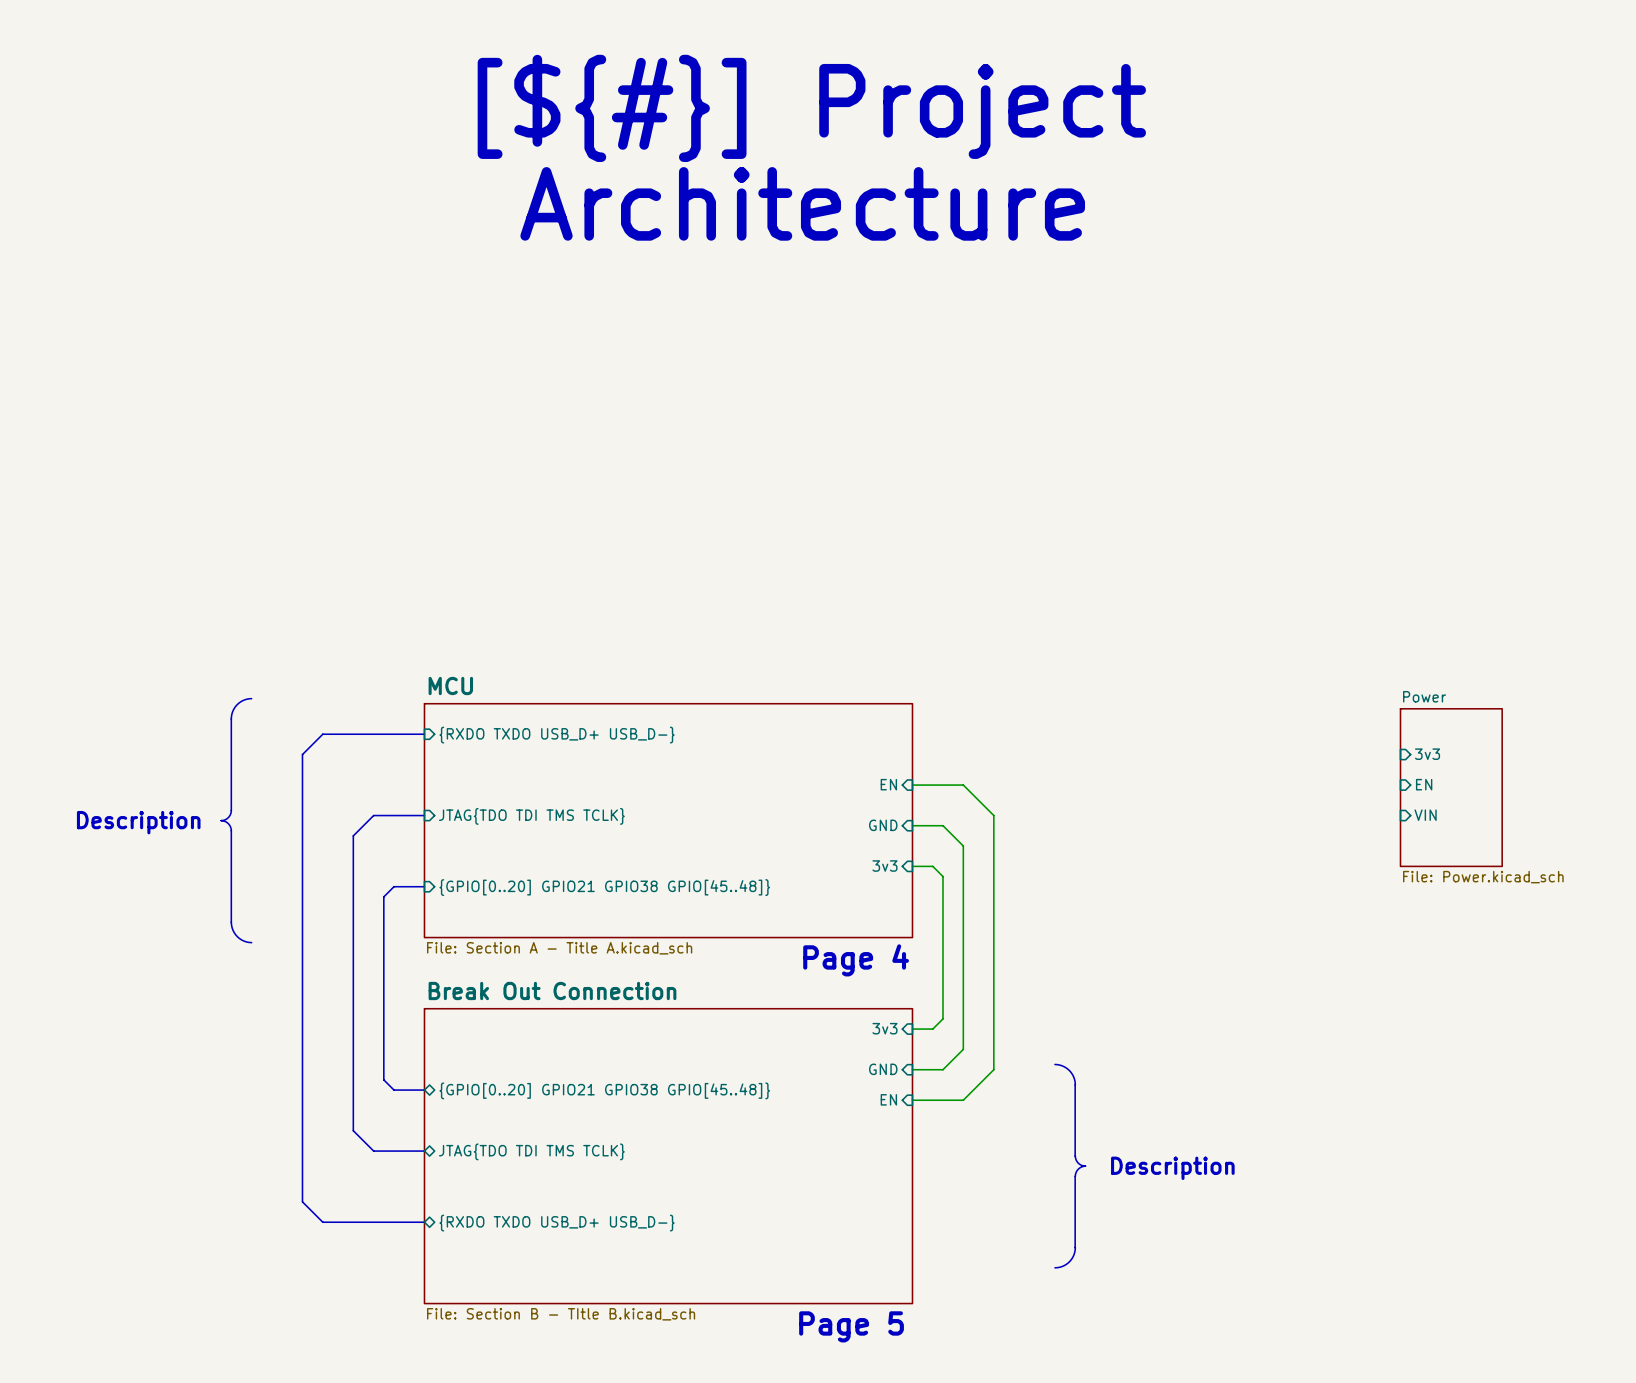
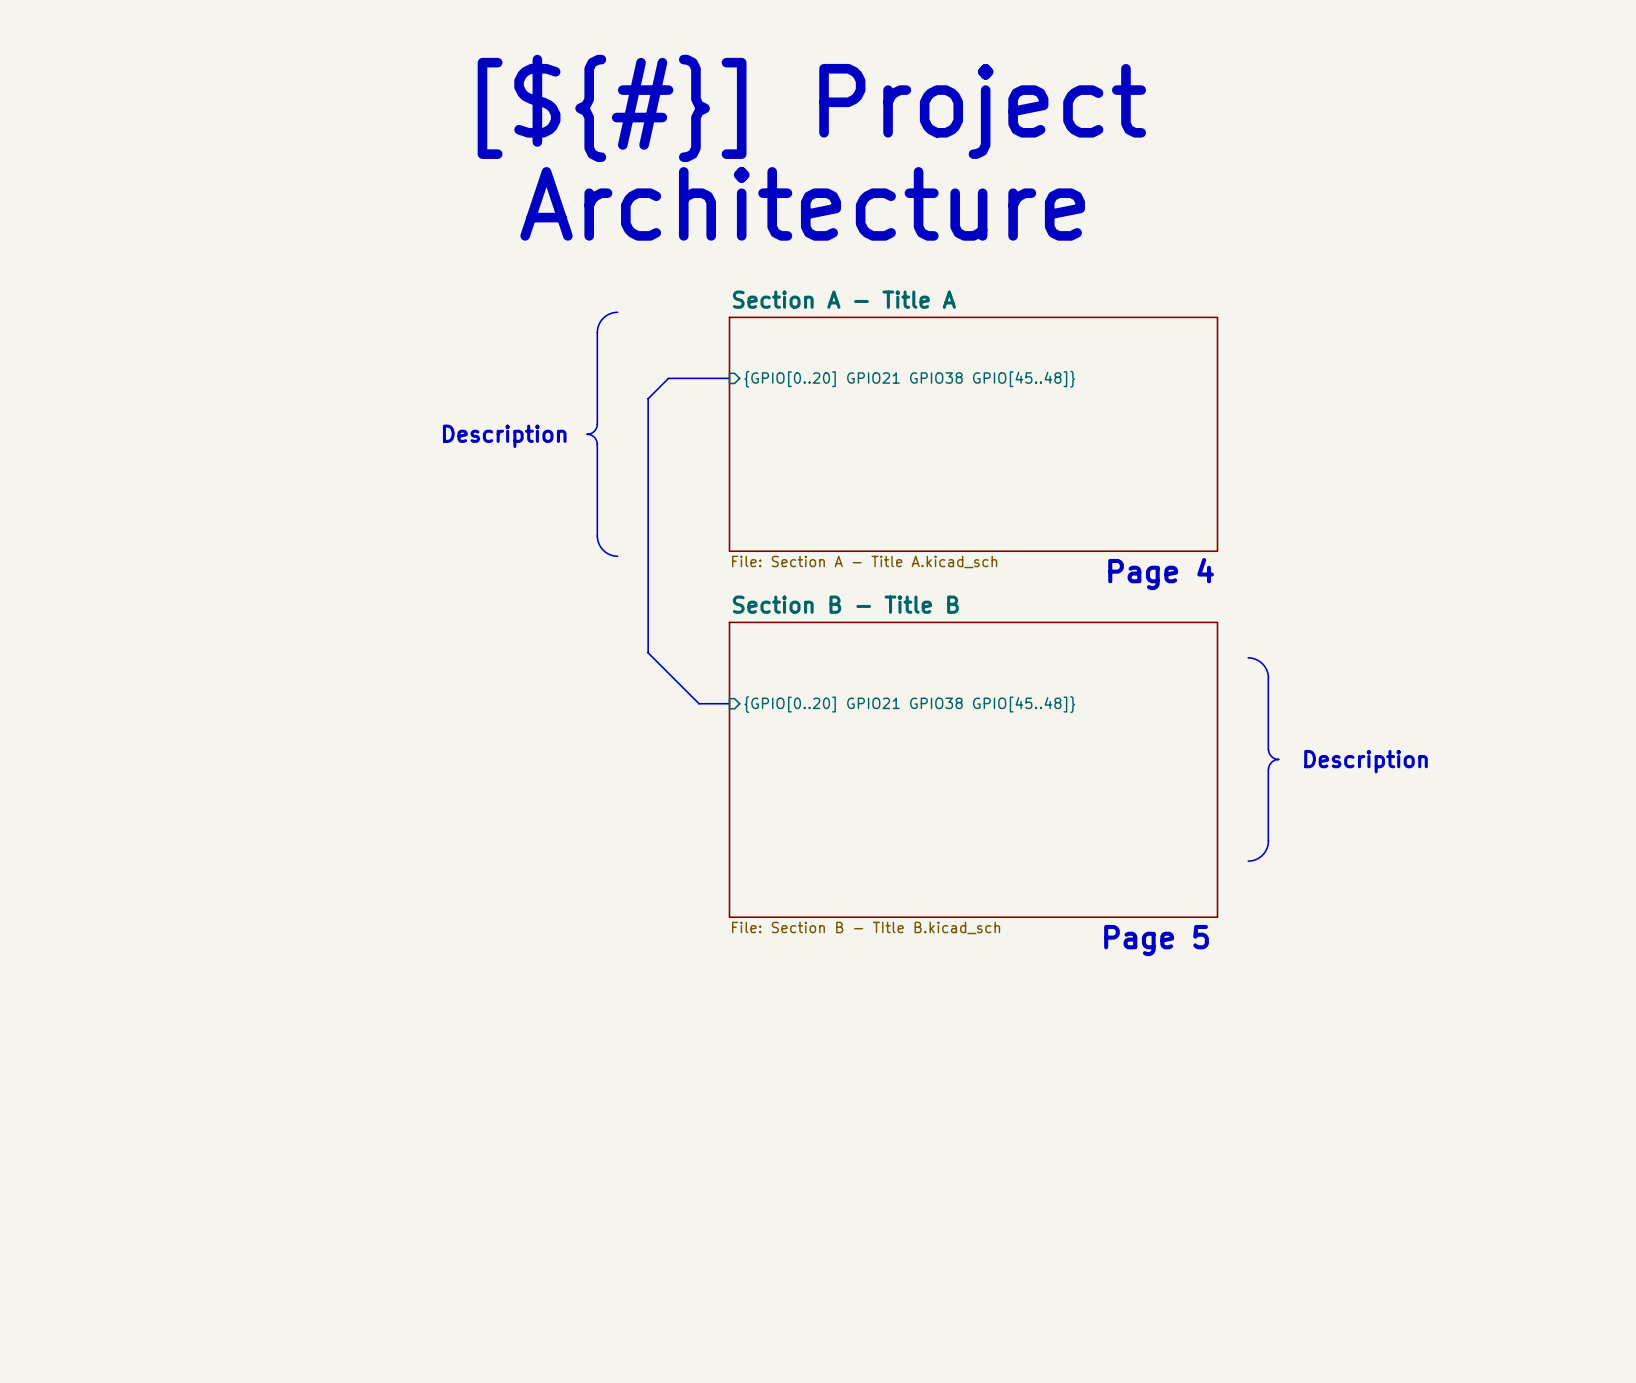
line: none -> (617, 312) (604, 316) (597, 328) (597, 425) (594, 431) (587, 434) (593, 436) (597, 443) (598, 541) (605, 552) (617, 556)
bus: none -> (729, 378) (668, 378) (648, 398) (648, 652) (698, 703) (729, 703)
sheet pin: none -> {GPIO[0..20] GPIO21 GPIO38 GPIO[45..48]} (909, 379)
sheet Section A - Title A: none -> File: Section A - Title A.kicad_sch (973, 434)
text: none -> Description (504, 436)
text: none -> Page 4 (1161, 574)
line: none -> (1248, 657) (1255, 659) (1262, 663) (1266, 670) (1268, 678)
line: none -> (1268, 678) (1268, 749)
line: (251, 698) (238, 703) (231, 714) (231, 811) (228, 817) (221, 820) (228, 823) (231, 829) (232, 927) (239, 938) (251, 942) -> none
sheet pin: none -> {GPIO[0..20] GPIO21 GPIO38 GPIO[45..48]} (909, 704)
bus: (424, 734) (322, 734) (302, 754) (302, 1201) (322, 1222) (424, 1222) -> none
sheet pin: {RXDO TXDO USB_D+ USB_D-} (557, 735) -> none
line: none -> (1268, 749) (1271, 756) (1278, 759) (1271, 762) (1268, 769)
sheet pin: 3v3 (1427, 754) -> none
text: none -> Description (1366, 761)
sheet Section B - Title B: none -> File: Section B - TItle B.kicad_sch (973, 769)
line: none -> (1268, 769) (1268, 840)
sheet pin: EN (888, 784) -> none
sheet pin: EN (1424, 784) -> none
wire: (912, 785) (963, 785) (993, 815) (993, 1069) (963, 1100) (912, 1100) -> none
sheet Power: File: Power.kicad_sch (1451, 787) -> none
bus: (424, 815) (373, 815) (353, 835) (353, 1130) (373, 1151) (424, 1151) -> none
sheet pin: VIN (1425, 815) -> none
sheet pin: JTAG{TDO TDI TMS TCLK} (531, 816) -> none
sheet MCU: File: Section A - Title A.kicad_sch (668, 820) -> none
text: Description (138, 822) -> none
sheet pin: GND (883, 825) -> none
wire: (912, 825) (942, 825) (963, 846) (963, 1049) (942, 1069) (912, 1069) -> none
line: none -> (1268, 840) (1267, 847) (1262, 855) (1254, 860) (1248, 861)
sheet pin: 3v3 (884, 866) -> none
wire: (912, 866) (932, 866) (942, 876) (942, 1018) (932, 1029) (912, 1029) -> none
bus: (424, 886) (393, 886) (383, 896) (383, 1079) (393, 1090) (424, 1090) -> none
sheet pin: {GPIO[0..20] GPIO21 GPIO38 GPIO[45..48]} (604, 887) -> none
text: none -> Page 5 (1156, 940)
text: Page 4 (856, 960) -> none
sheet pin: 3v3 (884, 1028) -> none
line: (1054, 1064) (1062, 1066) (1069, 1070) (1073, 1077) (1075, 1084) -> none
sheet pin: GND (883, 1069) -> none
line: (1075, 1084) (1075, 1156) -> none
sheet pin: {GPIO[0..20] GPIO21 GPIO38 GPIO[45..48]} (604, 1090) -> none
sheet pin: EN (888, 1099) -> none
sheet pin: JTAG{TDO TDI TMS TCLK} (531, 1151) -> none
line: (1075, 1155) (1078, 1163) (1085, 1166) (1078, 1169) (1075, 1176) -> none
sheet Break Out Connection: File: Section B - TItle B.kicad_sch (668, 1156) -> none
text: Description (1172, 1168) -> none
line: (1075, 1176) (1075, 1247) -> none
sheet pin: {RXDO TXDO USB_D+ USB_D-} (557, 1223) -> none
line: (1075, 1247) (1074, 1254) (1069, 1261) (1063, 1265) (1054, 1267) -> none
text: Page 5 (851, 1326) -> none

